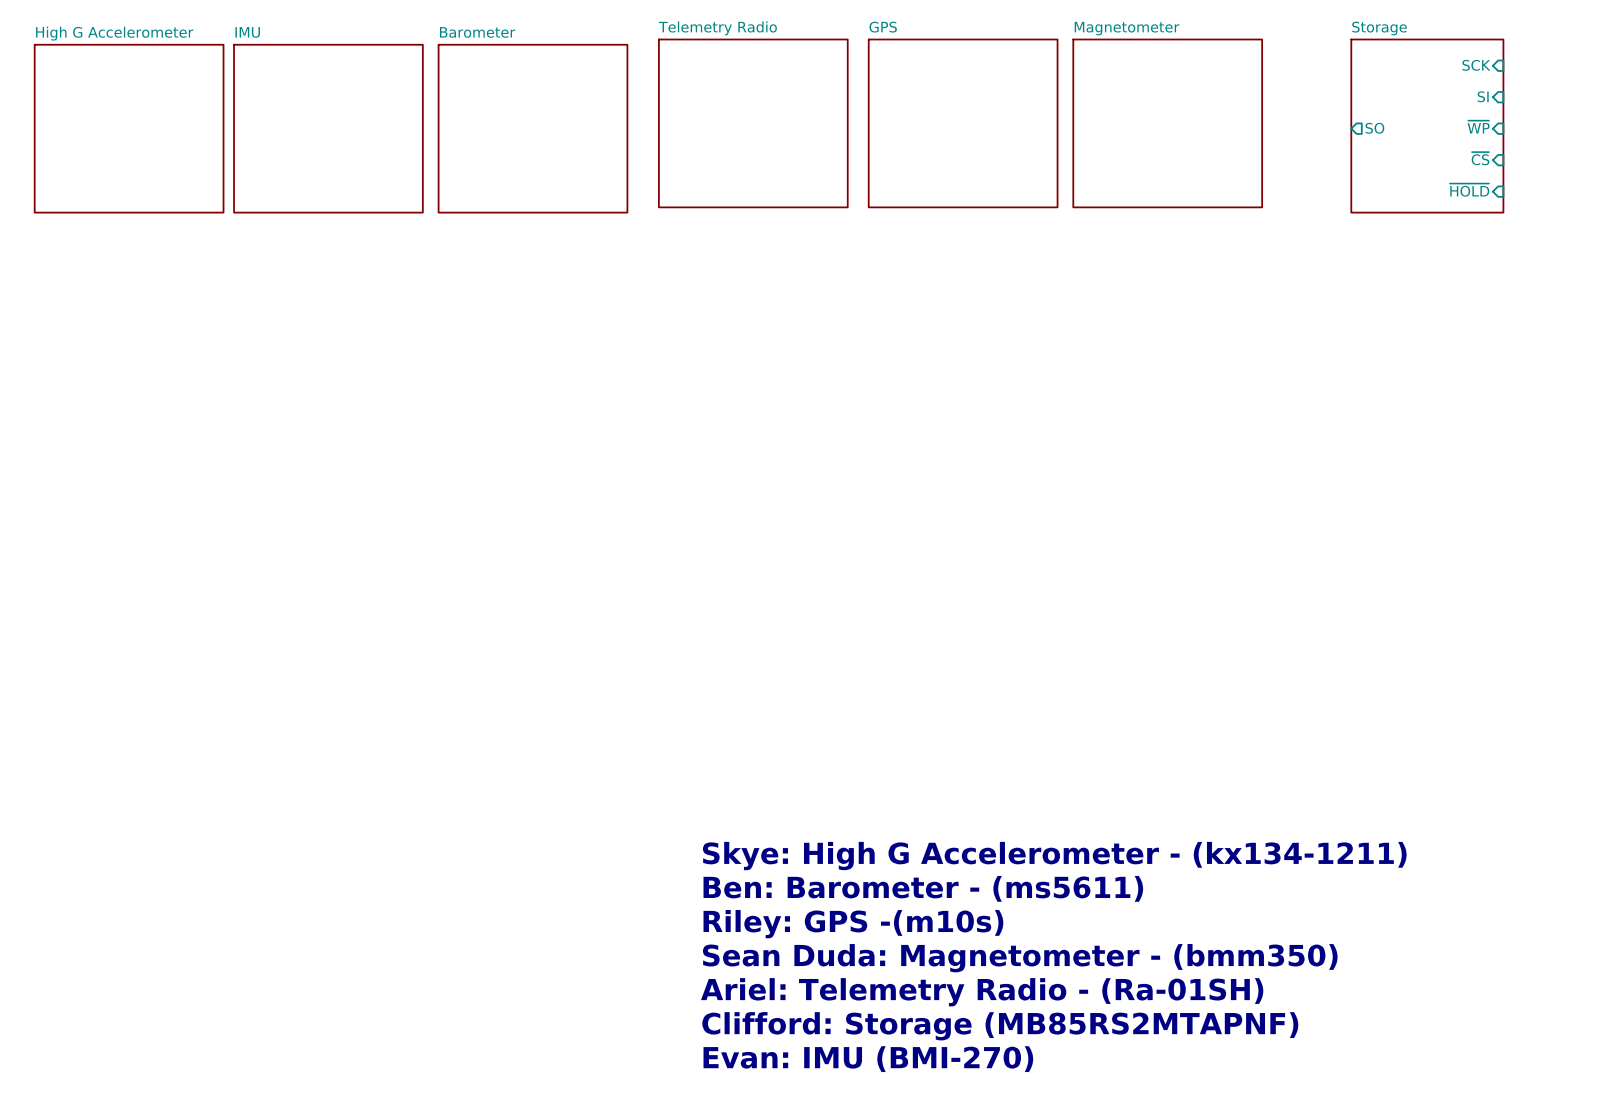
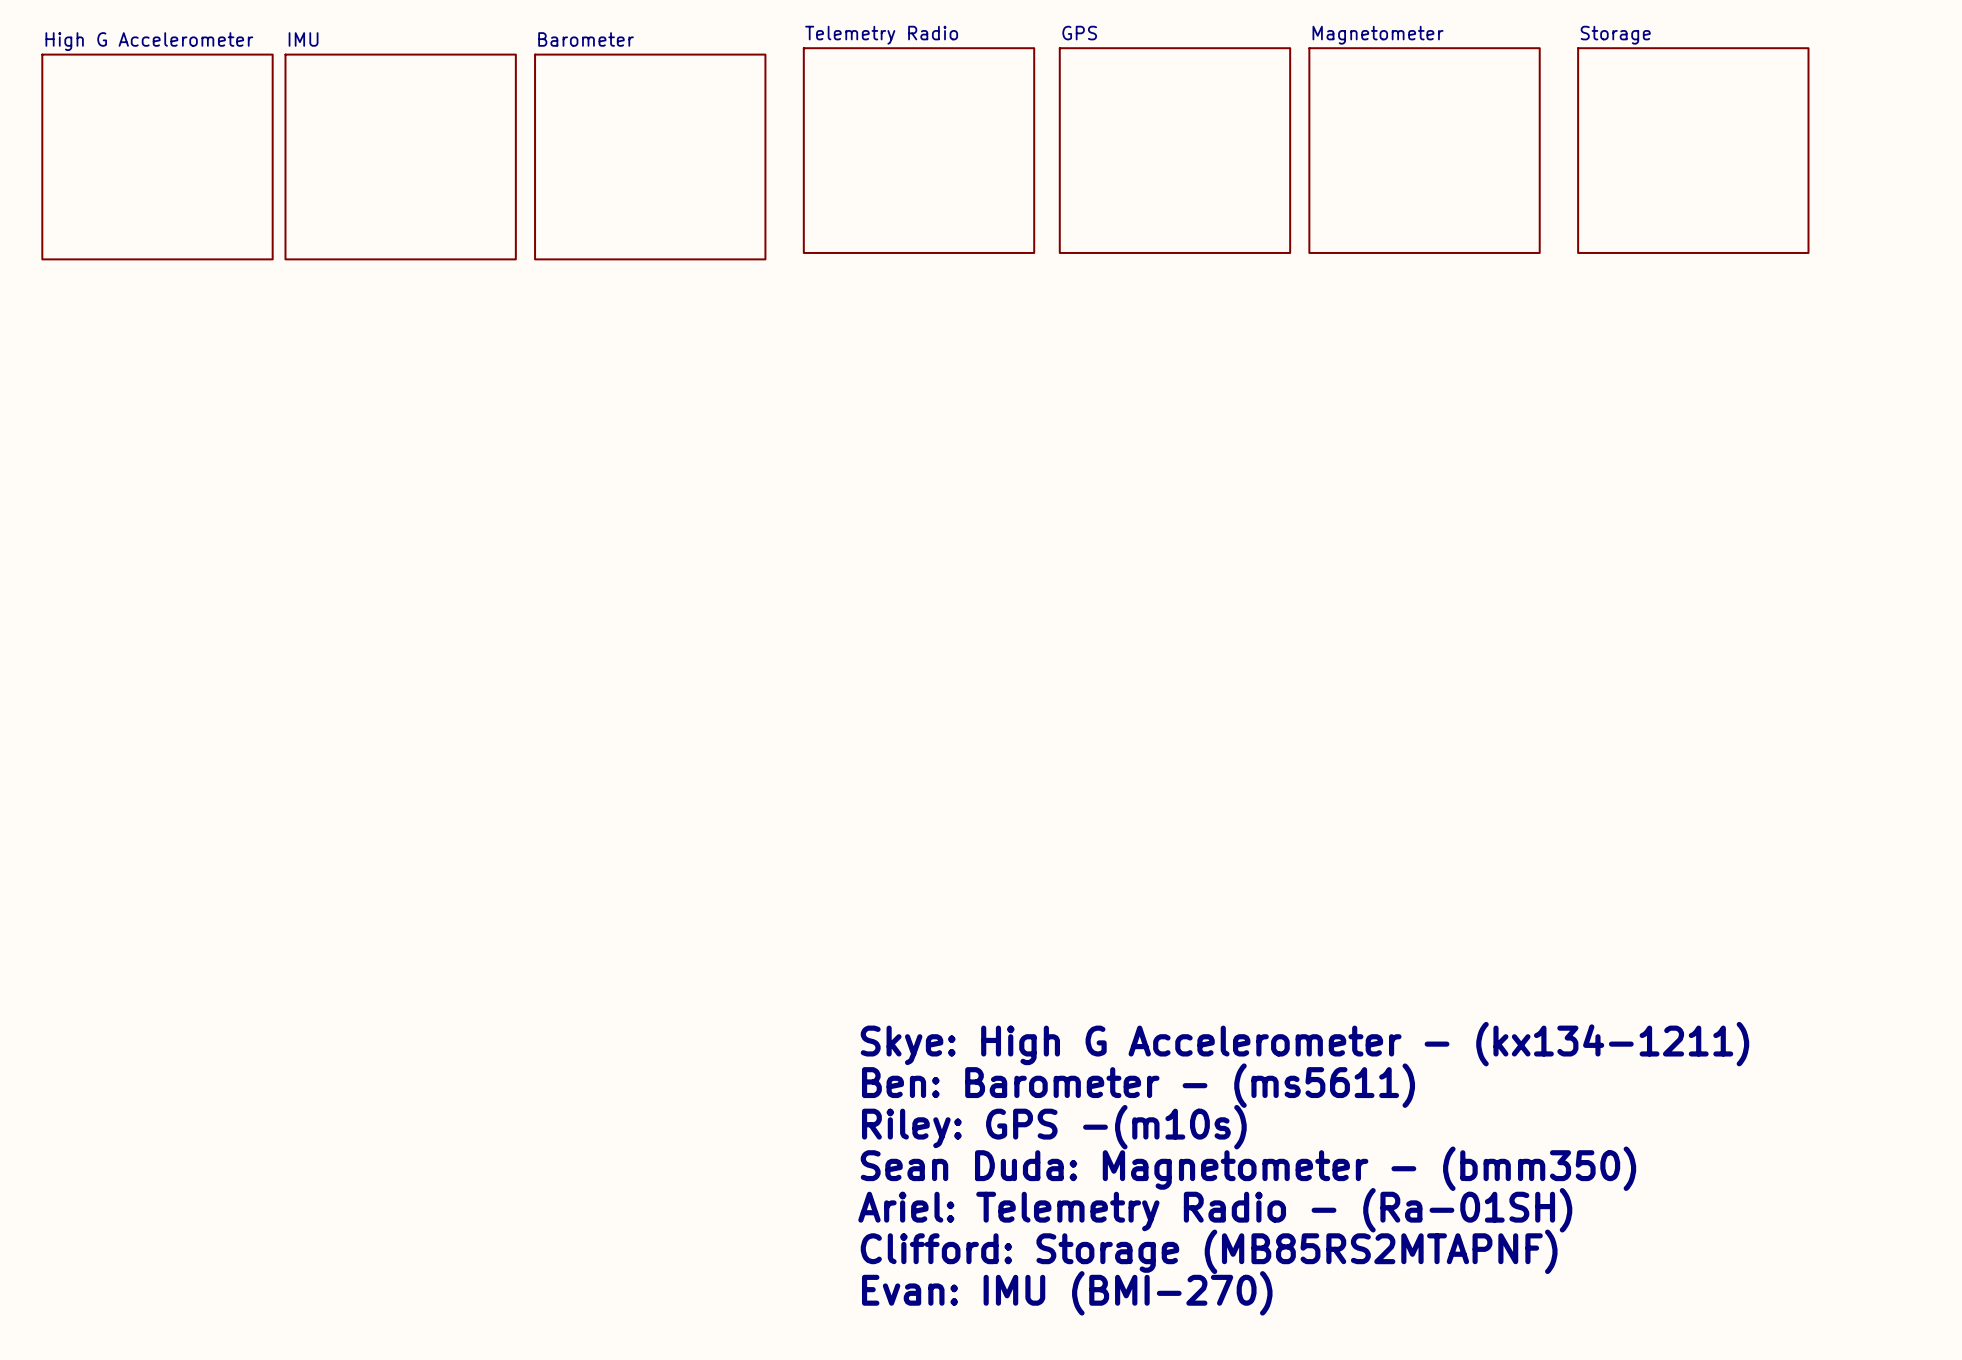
sheet pin: SCK (1476, 65) -> none
sheet pin: SI (1483, 96) -> none
sheet Storage: none -> (1693, 150)
sheet Storage: (1427, 126) -> none
sheet pin: ~{WP} (1478, 127) -> none
sheet pin: SO (1374, 128) -> none
sheet pin: ~{CS} (1480, 158) -> none
sheet pin: ~{HOLD} (1469, 190) -> none

